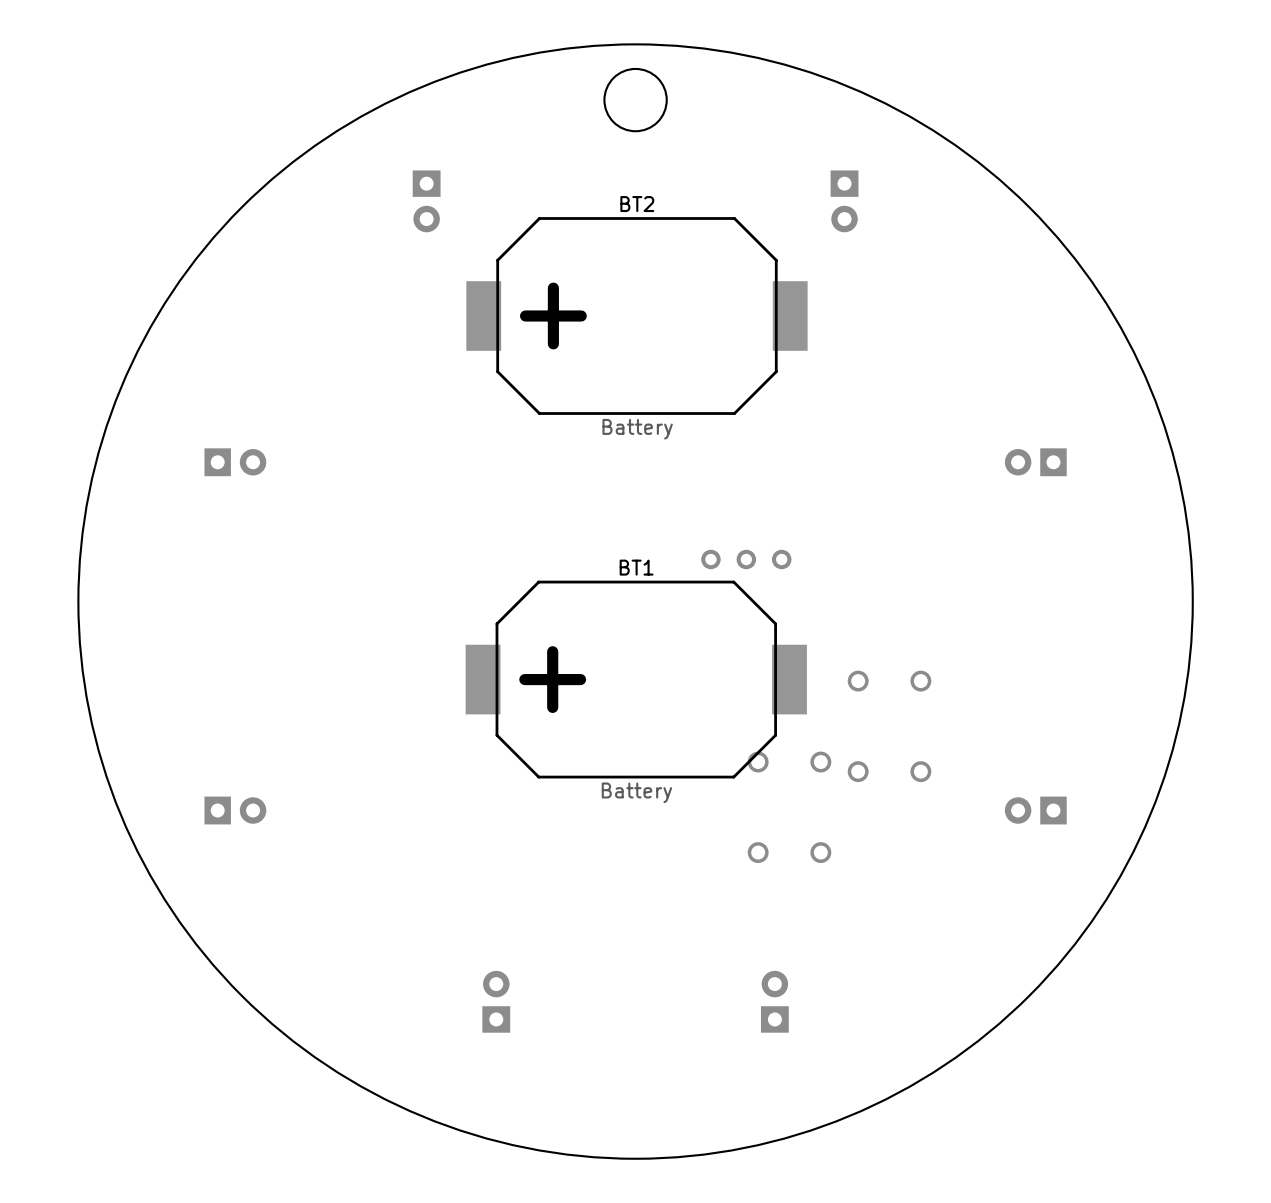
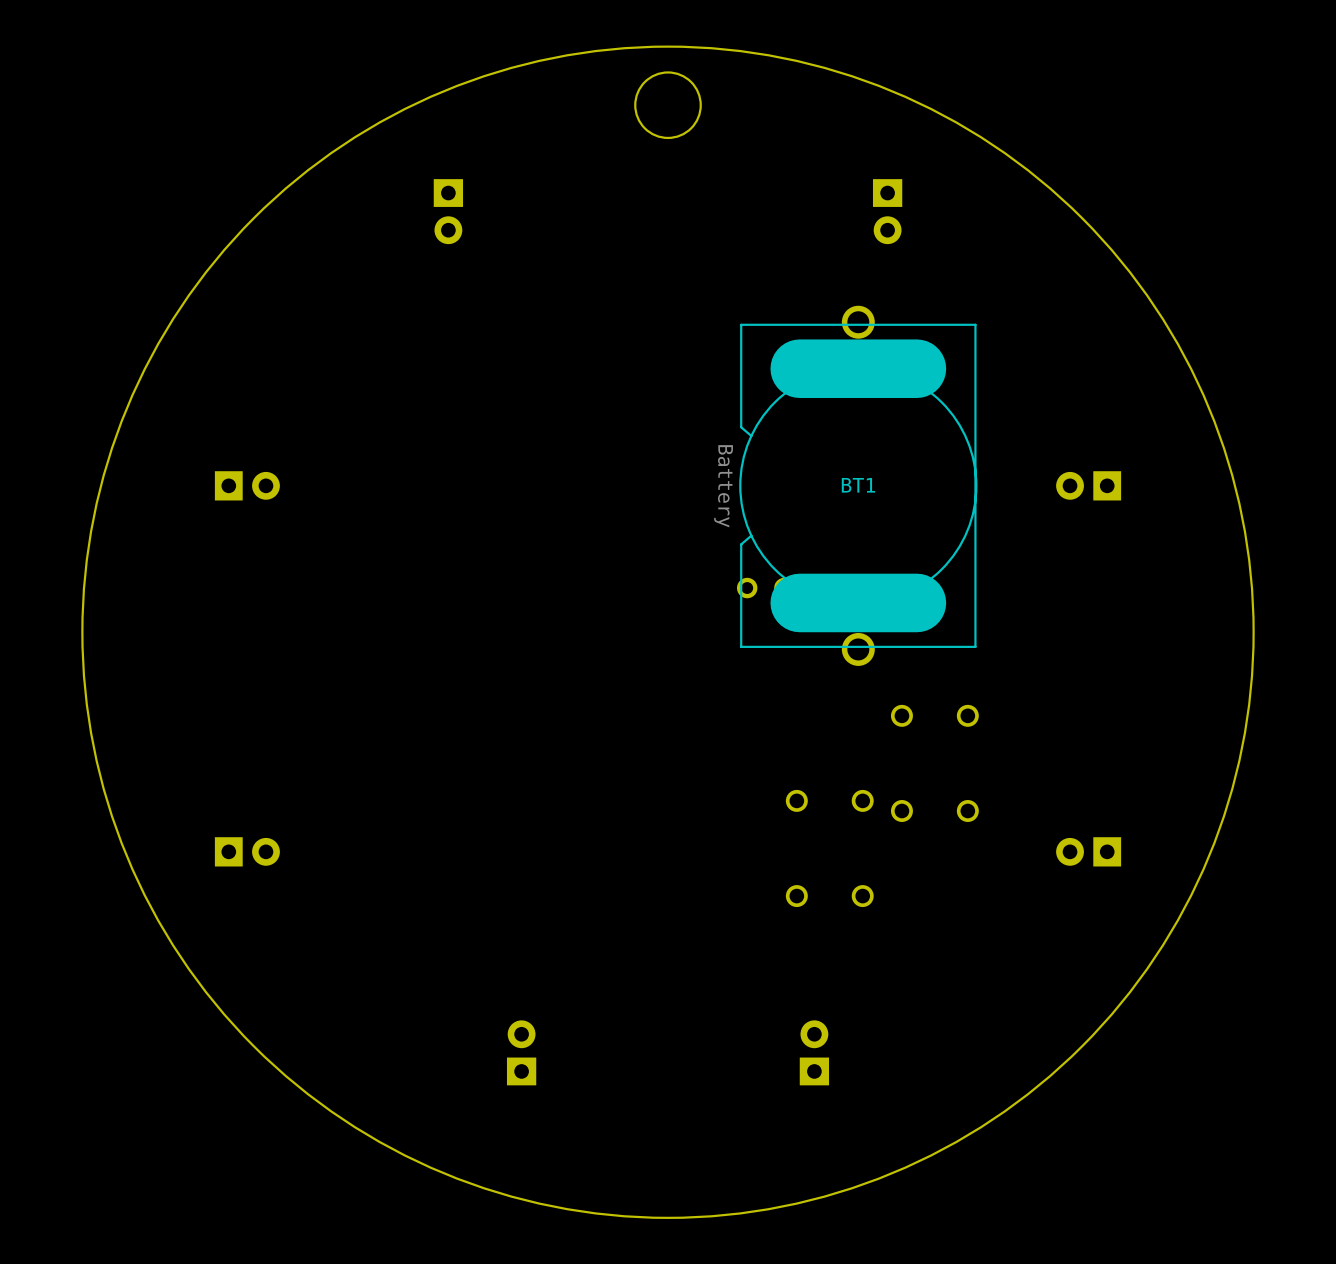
BT2: Battery (636, 316) -> none
BT1 name position: BT1 (636, 567) -> BT1 (858, 485)
BT1 footprint: [465, 580, 807, 779] -> [739, 305, 978, 666]
BT1 value position: Battery (636, 792) -> Battery (723, 486)

